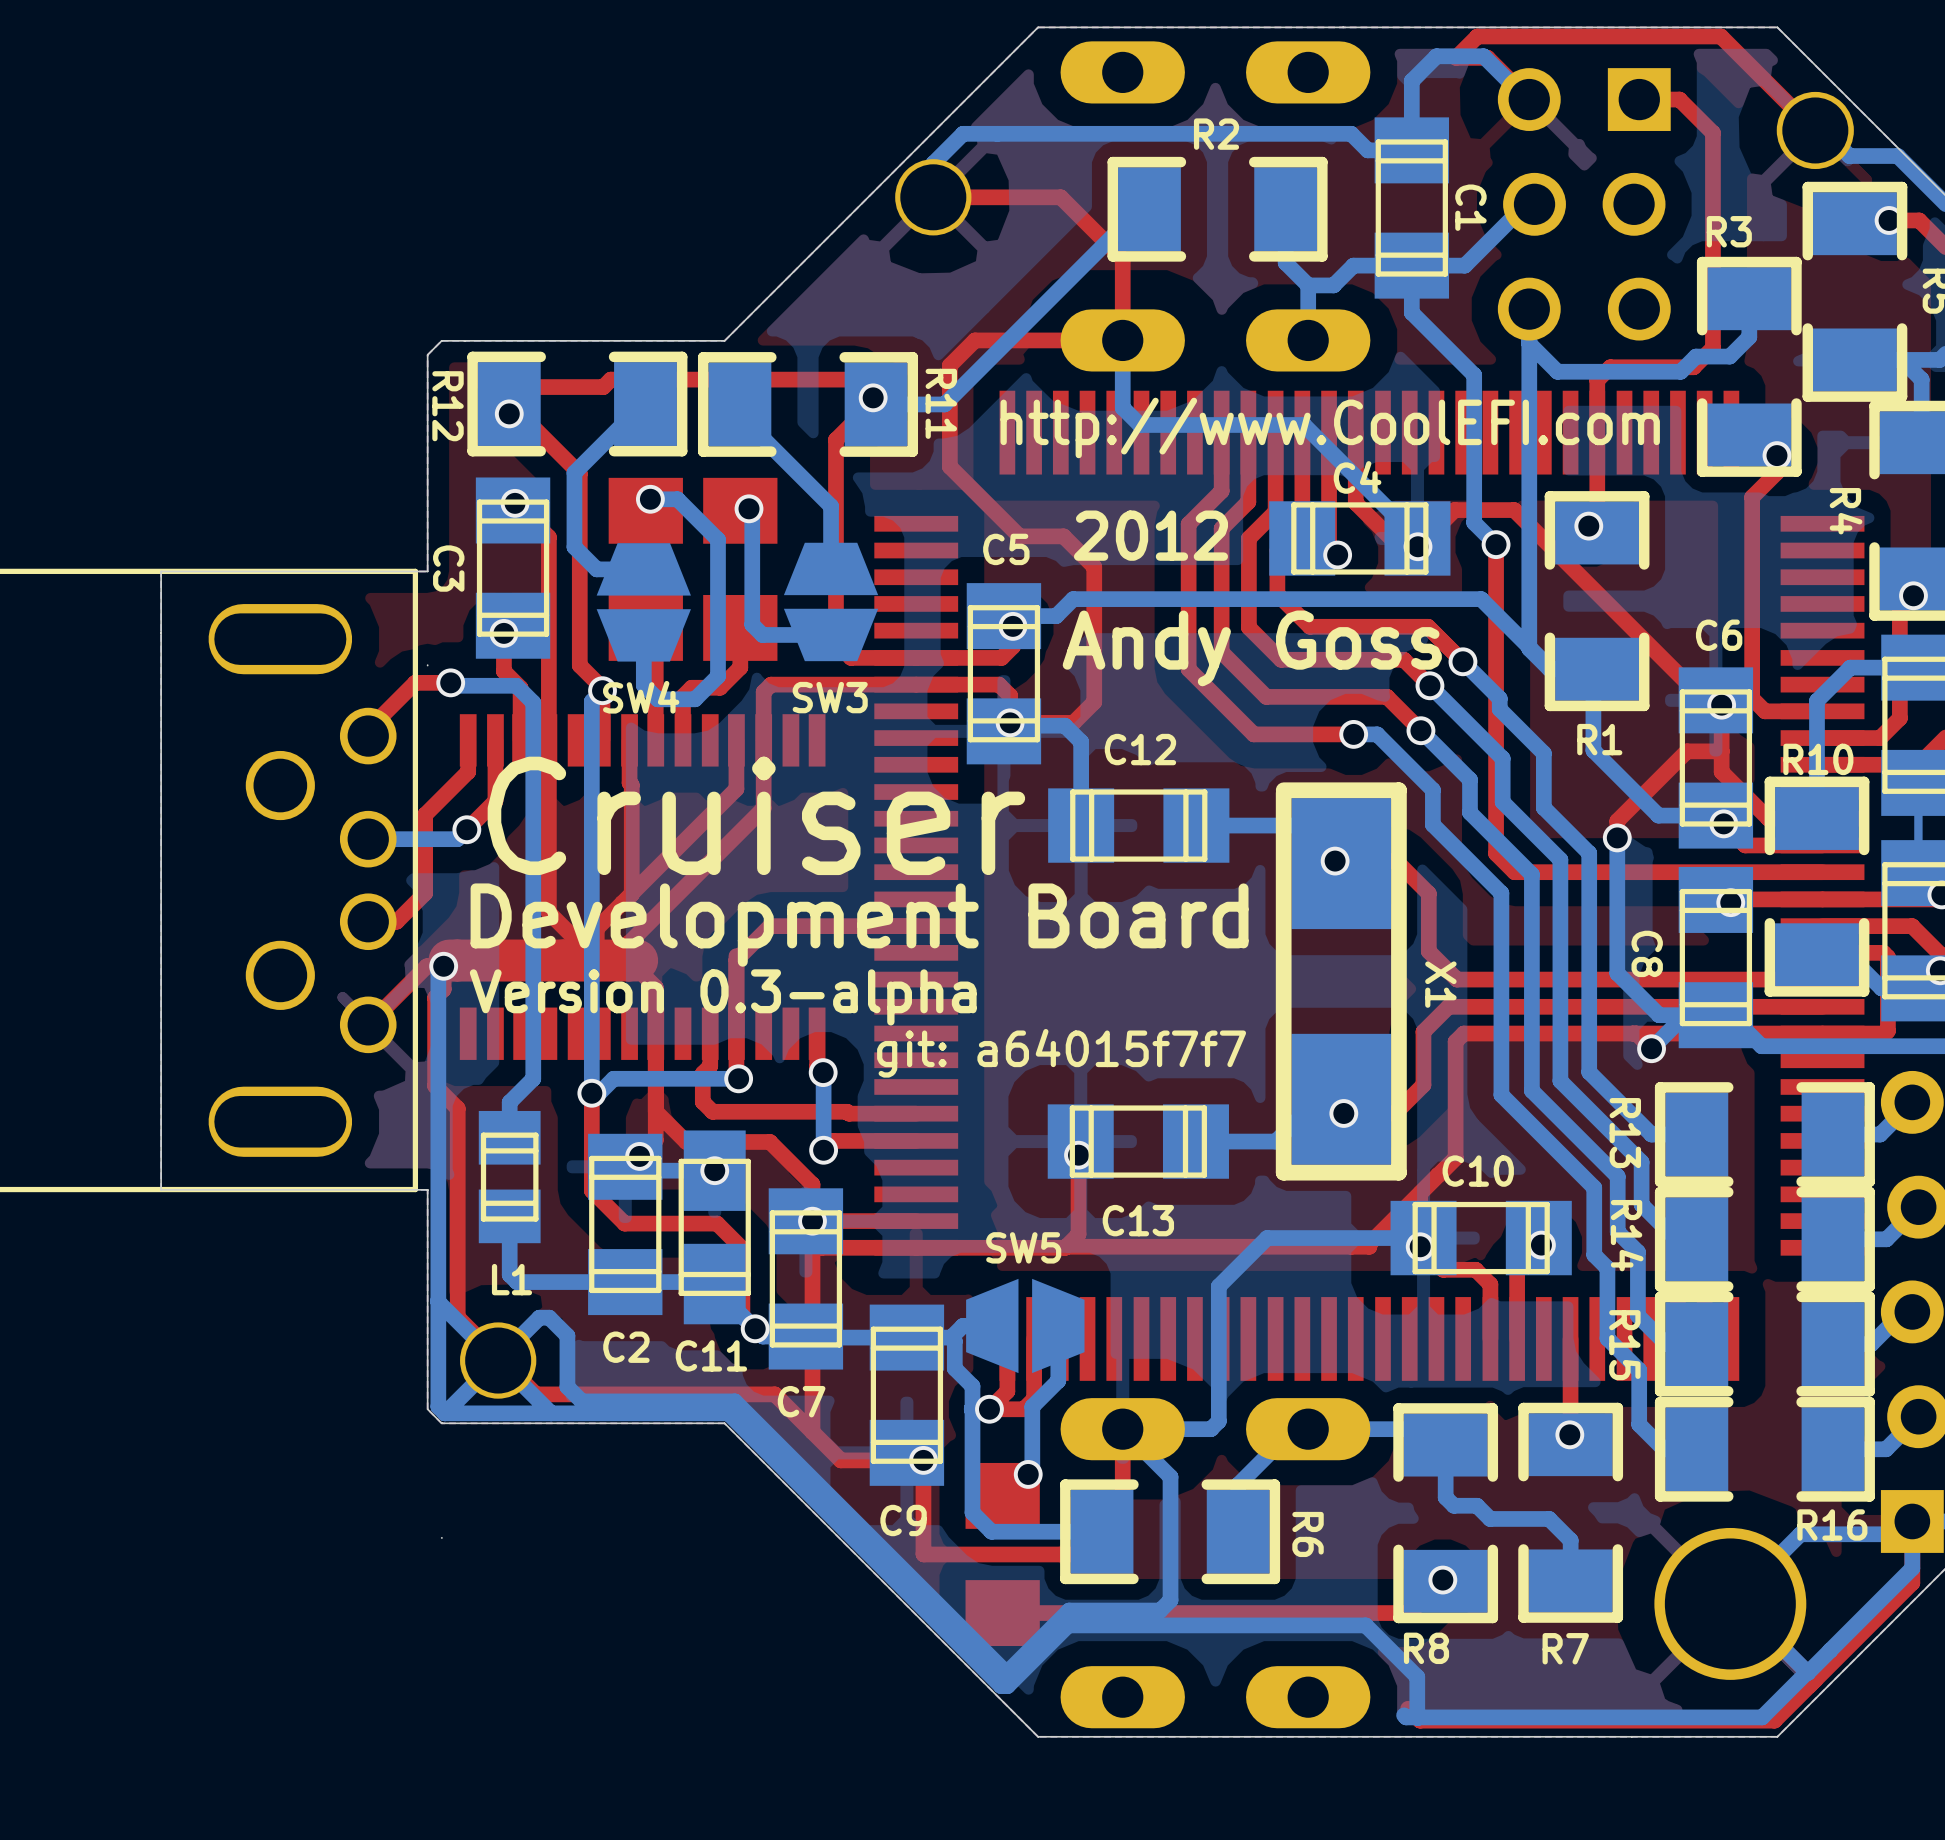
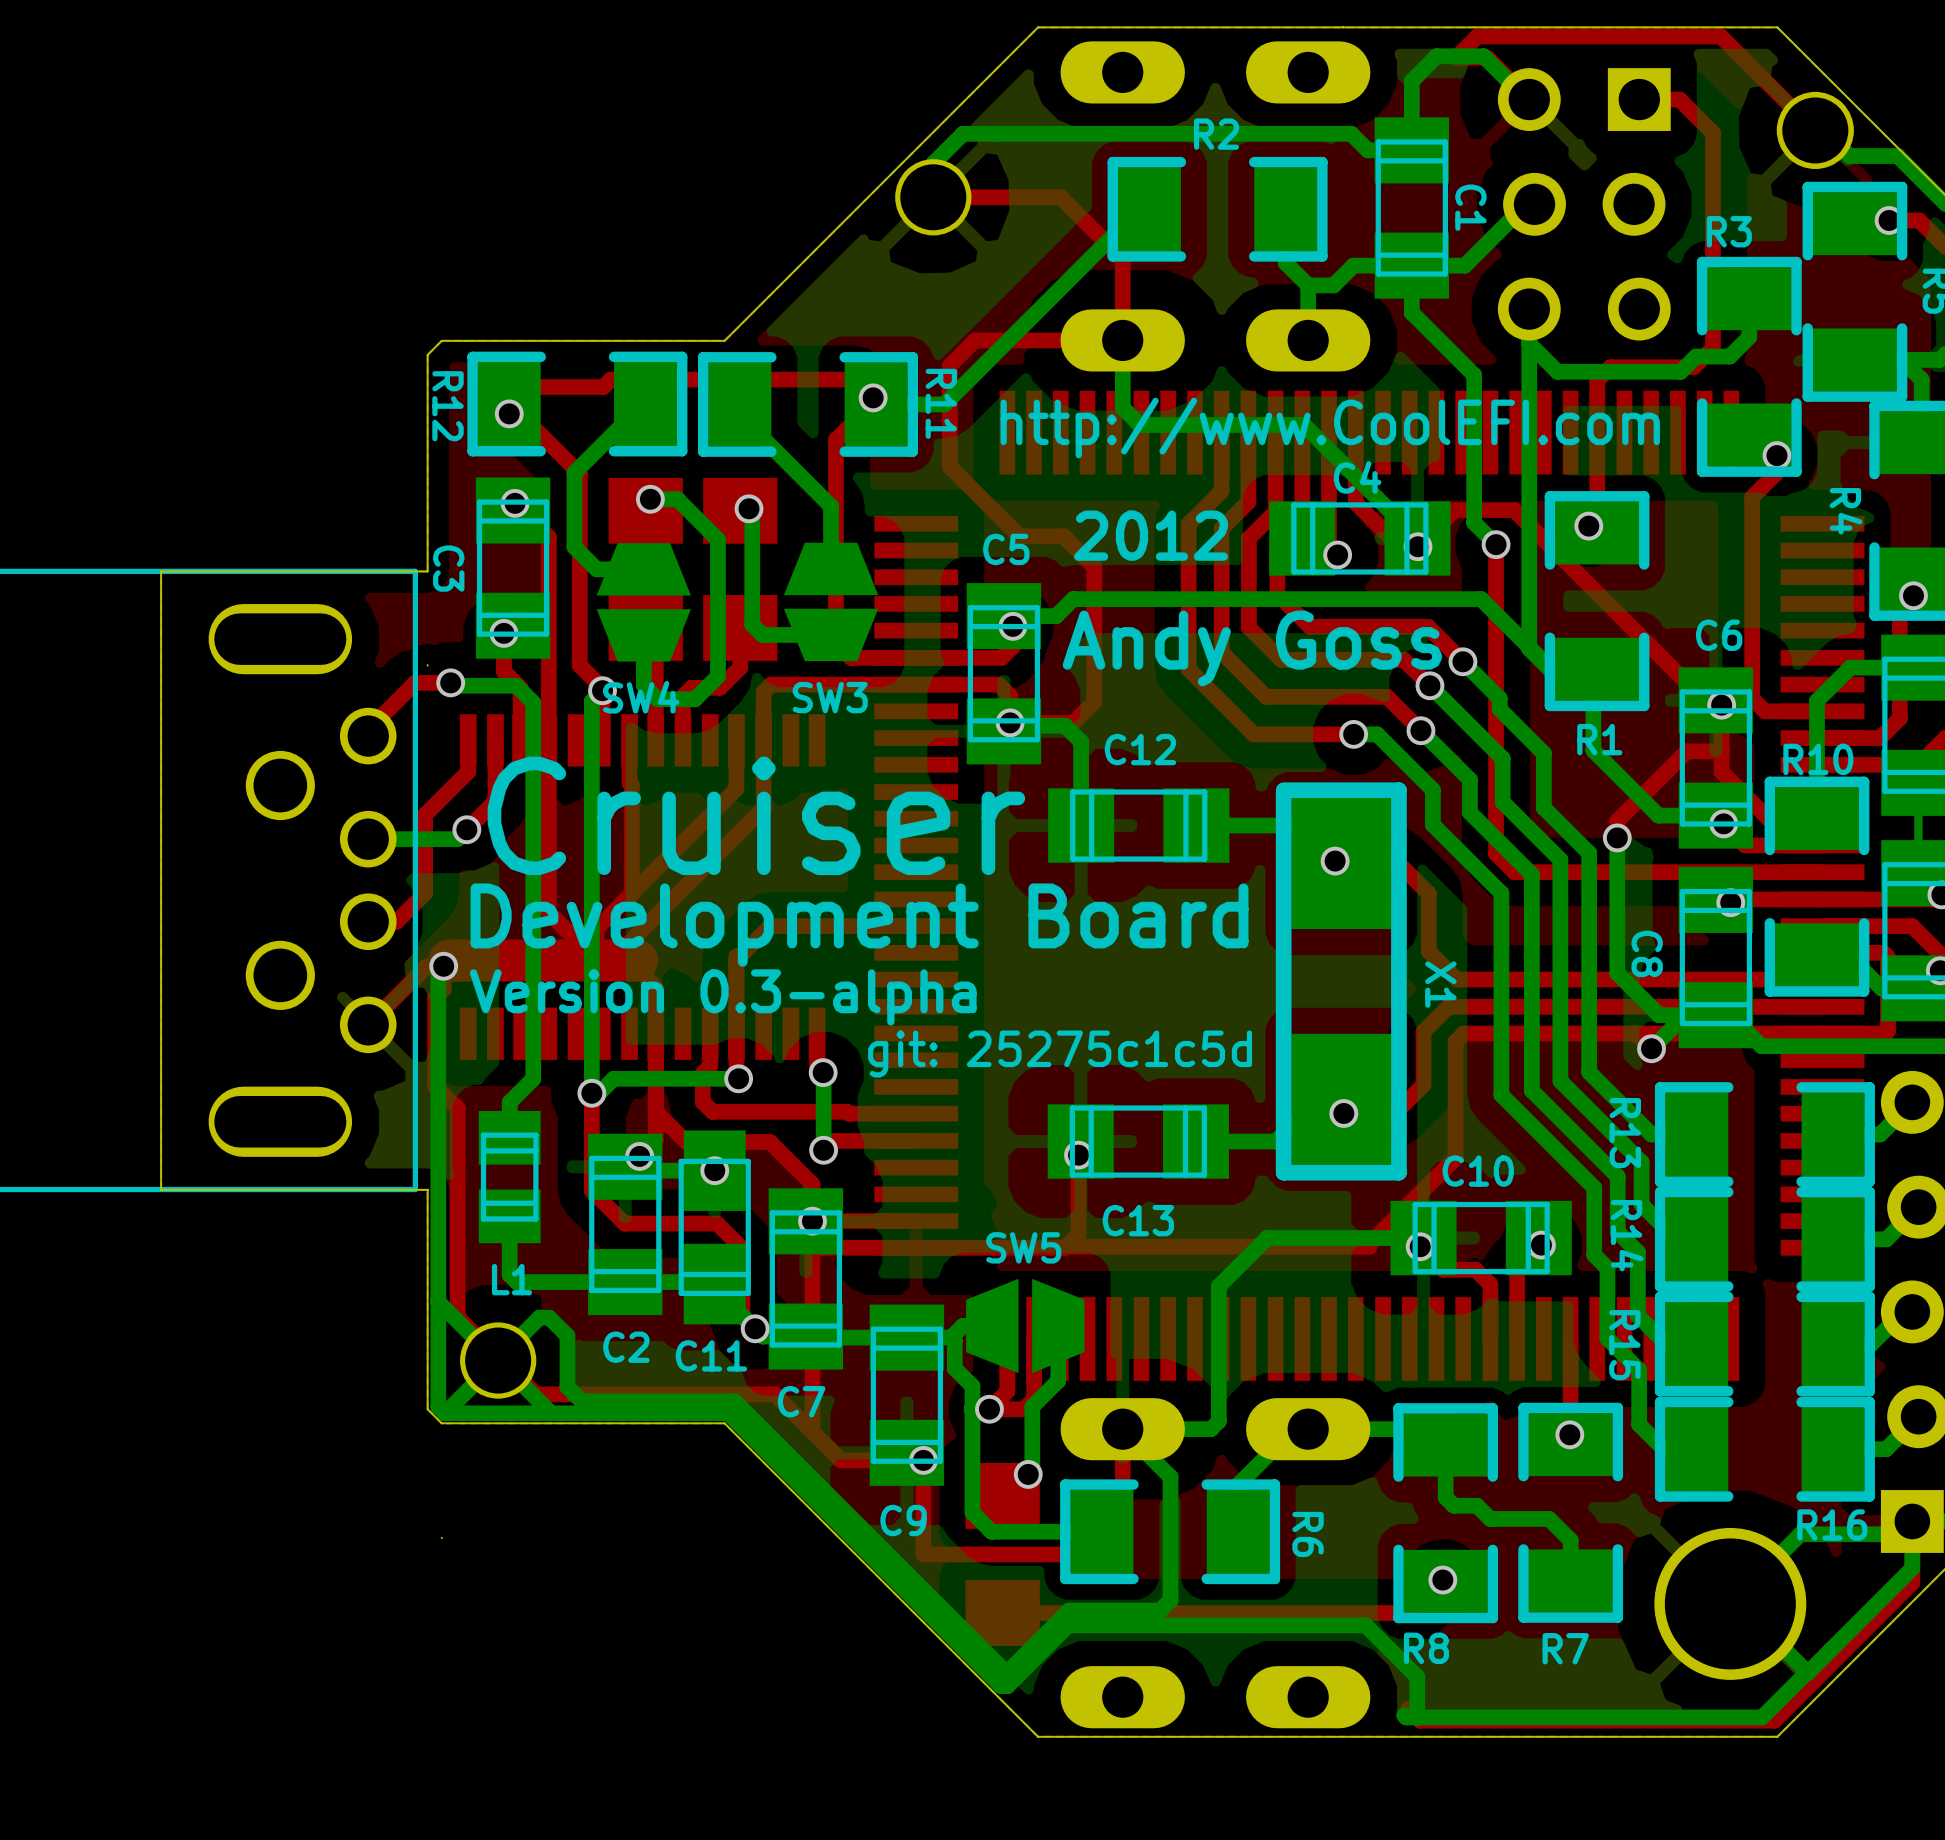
text: git: a64015f7f7 (1061, 1053) -> git: 25275c1c5d (1060, 1054)

